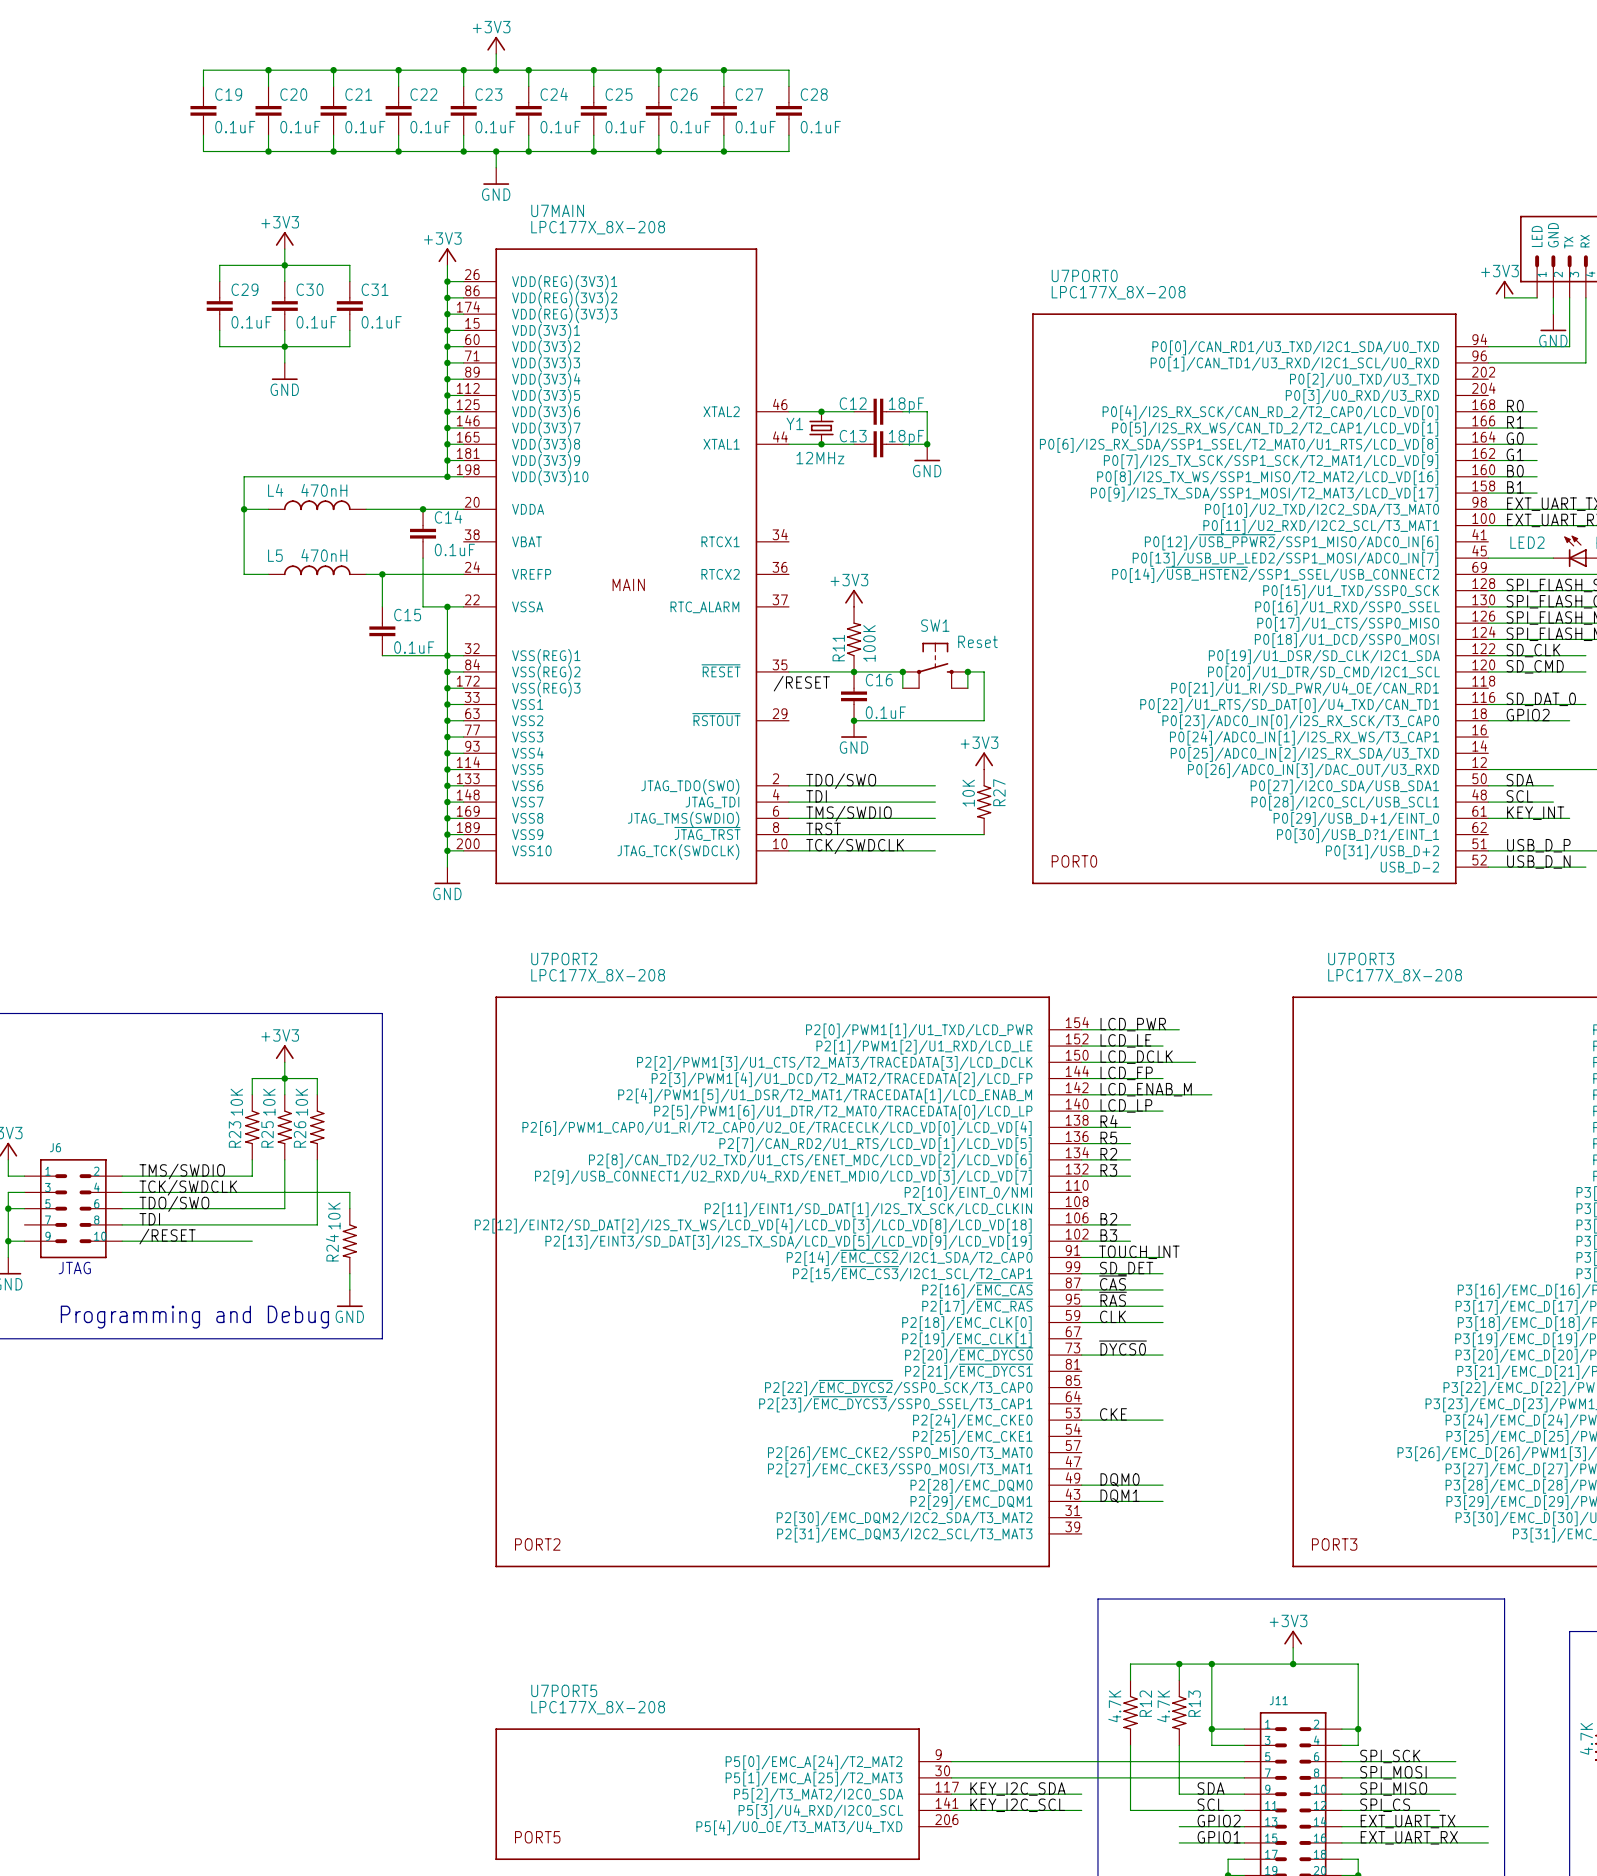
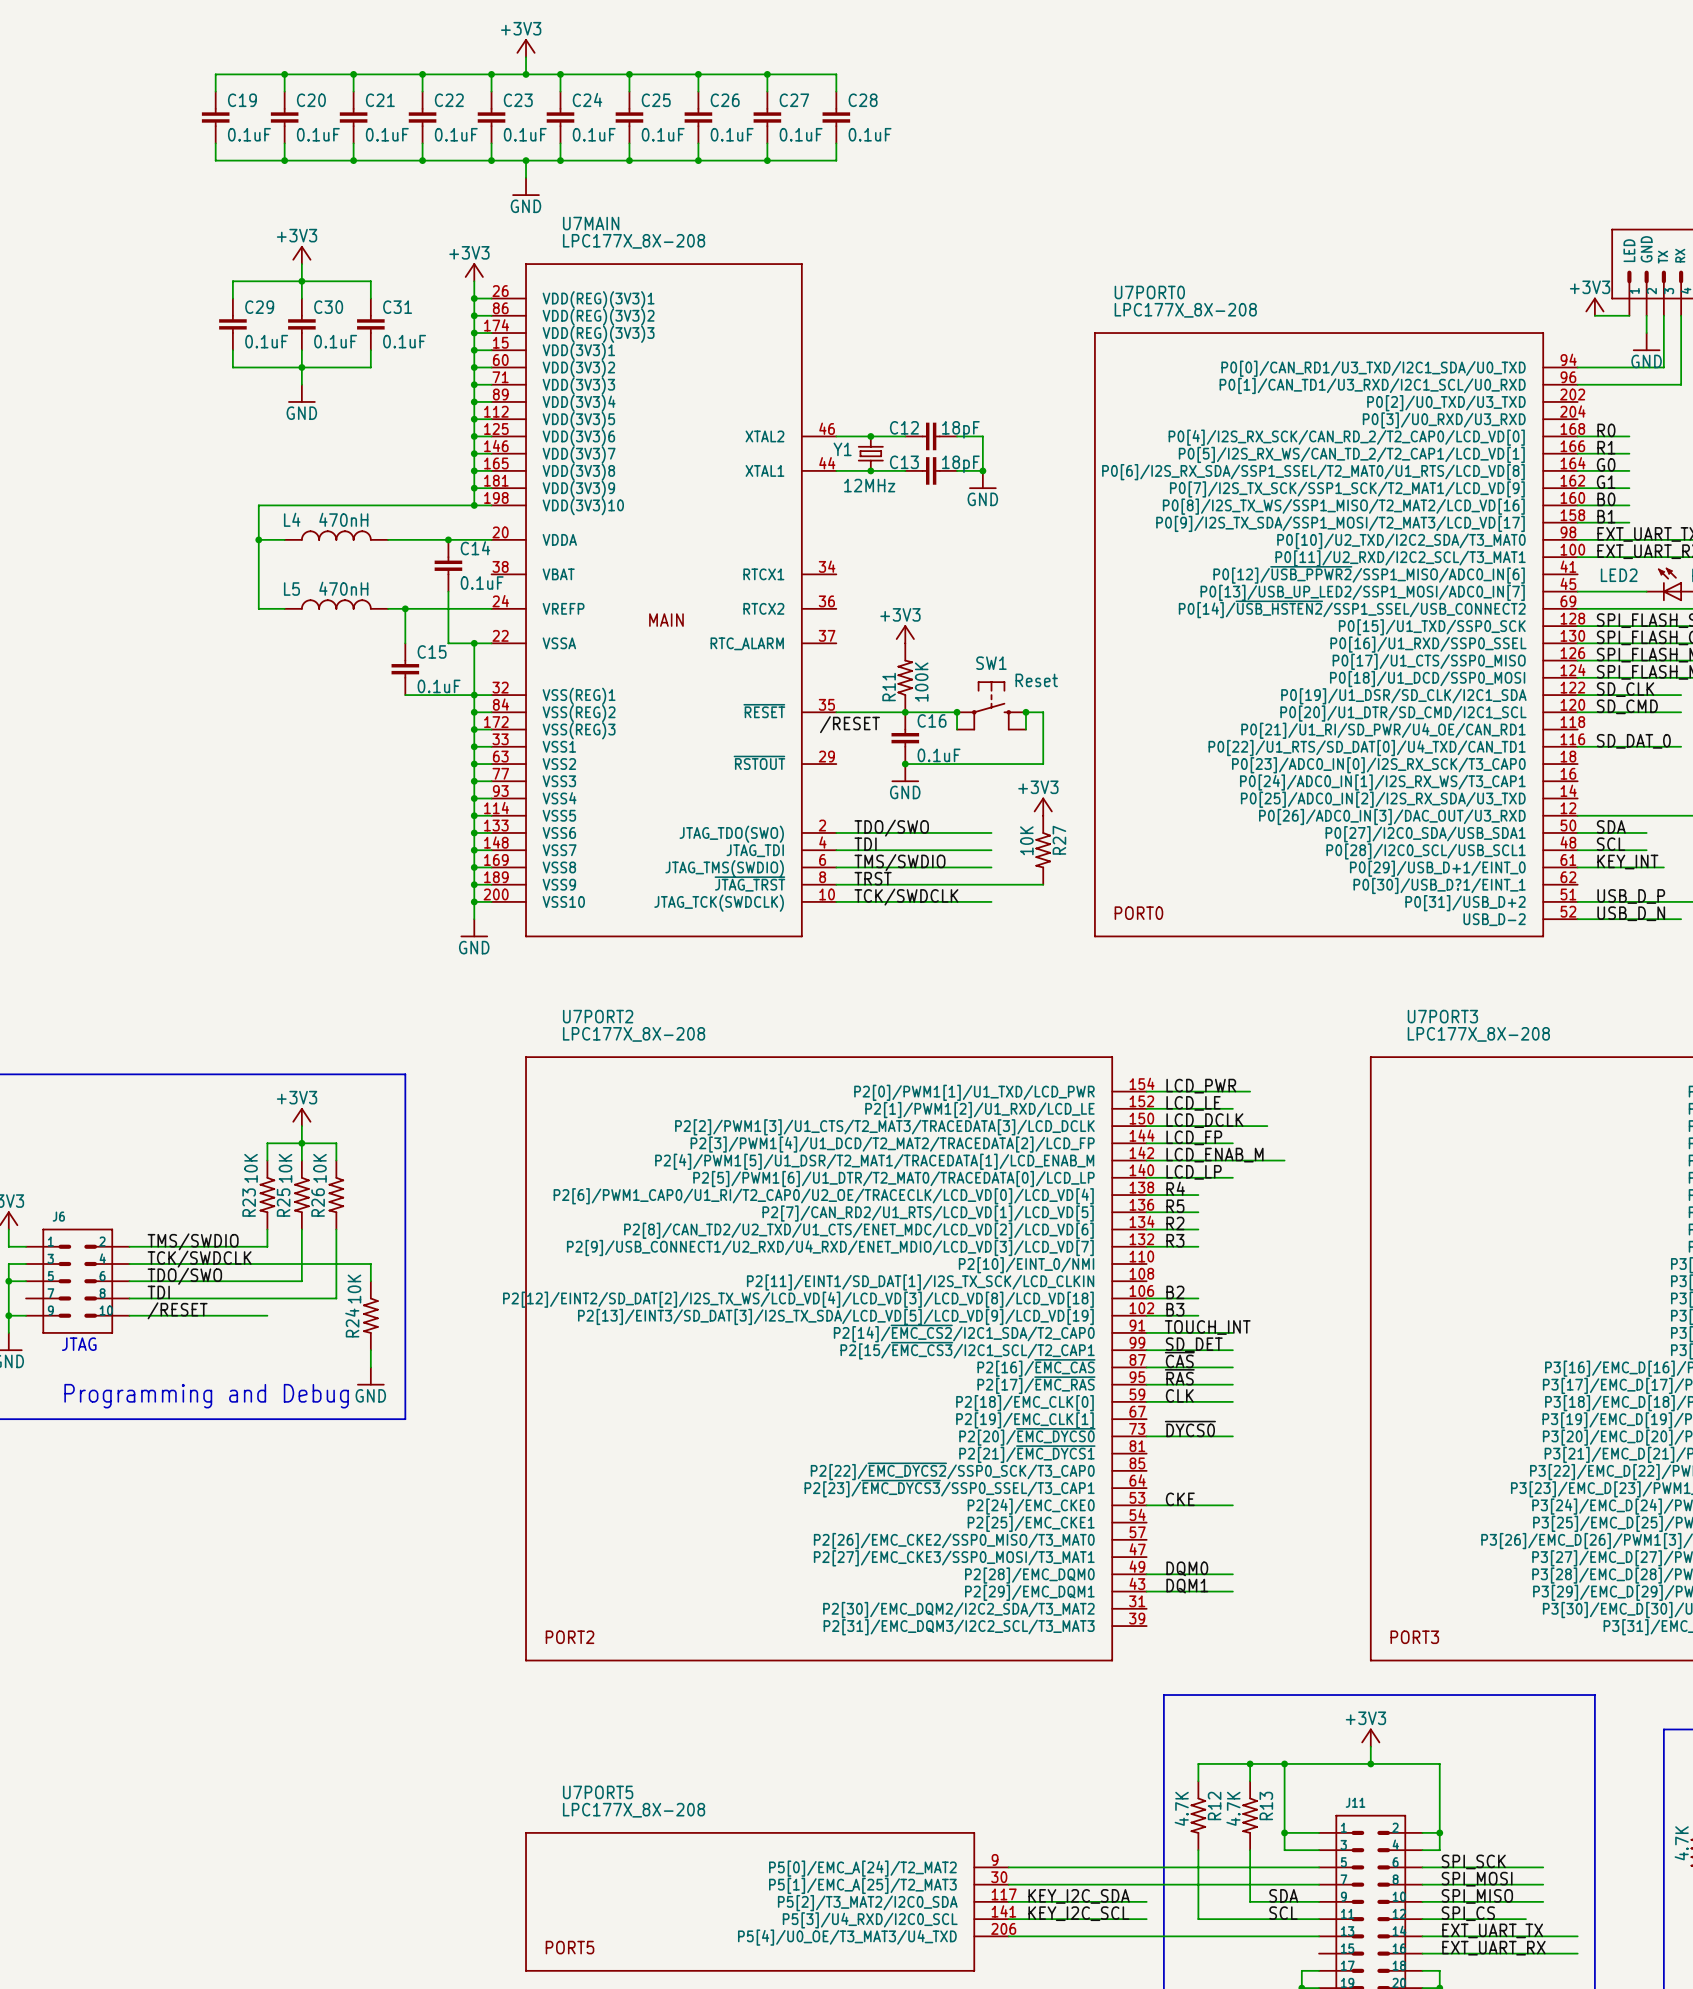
label: GPIO2 (1528, 715) -> none
wire: (1488, 720) (1569, 720) -> none
label: GPIO2 (1219, 1821) -> none
wire: none -> (1008, 1936) (1250, 1936)
label: GPIO1 (1219, 1837) -> none
wire: (1179, 1842) (1244, 1842) -> none

